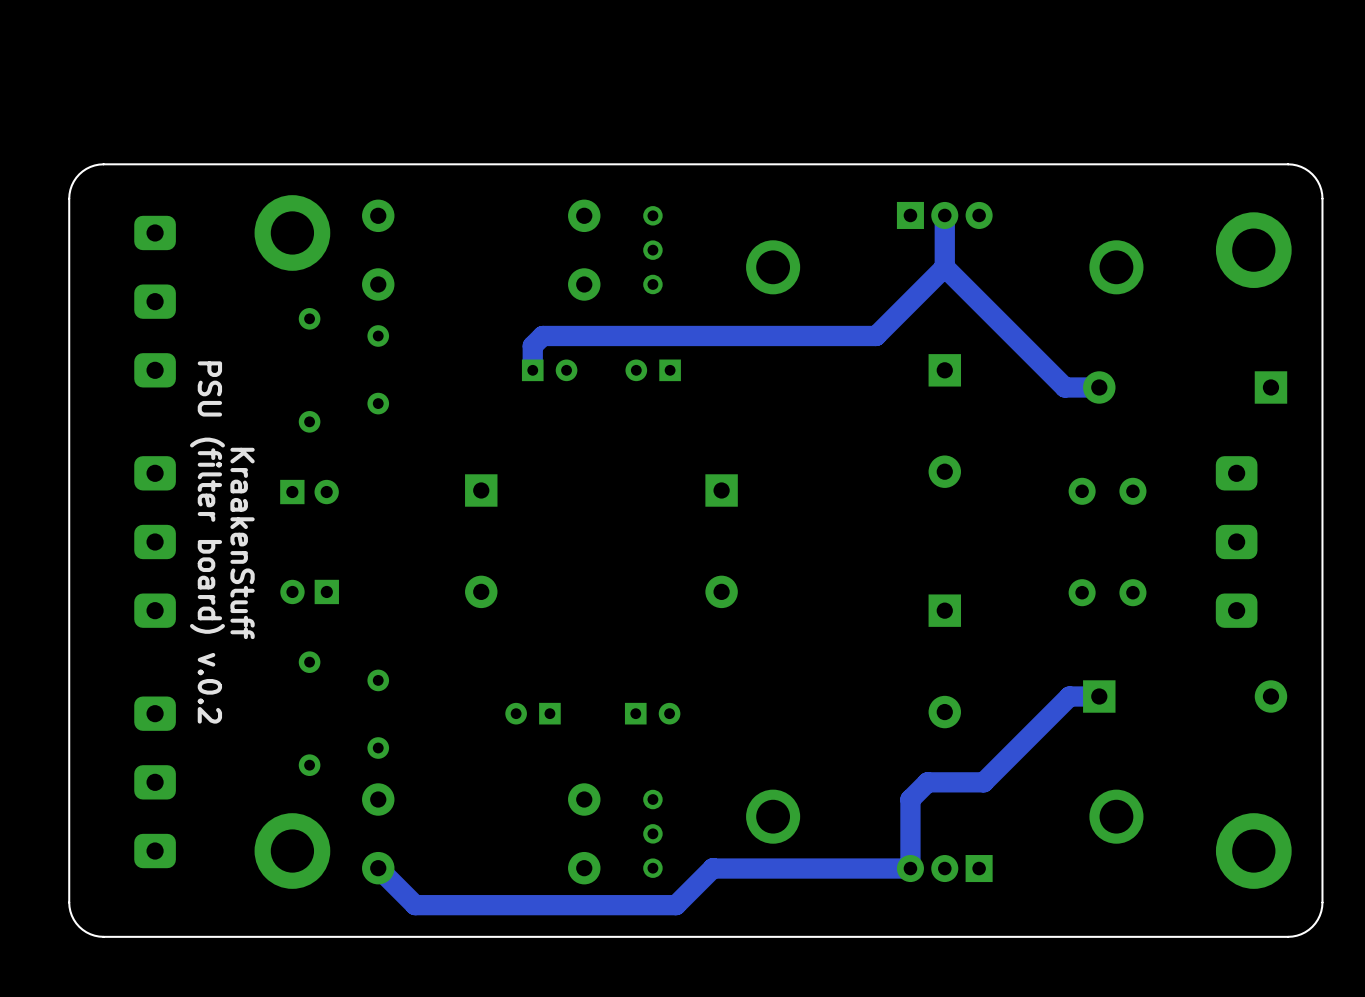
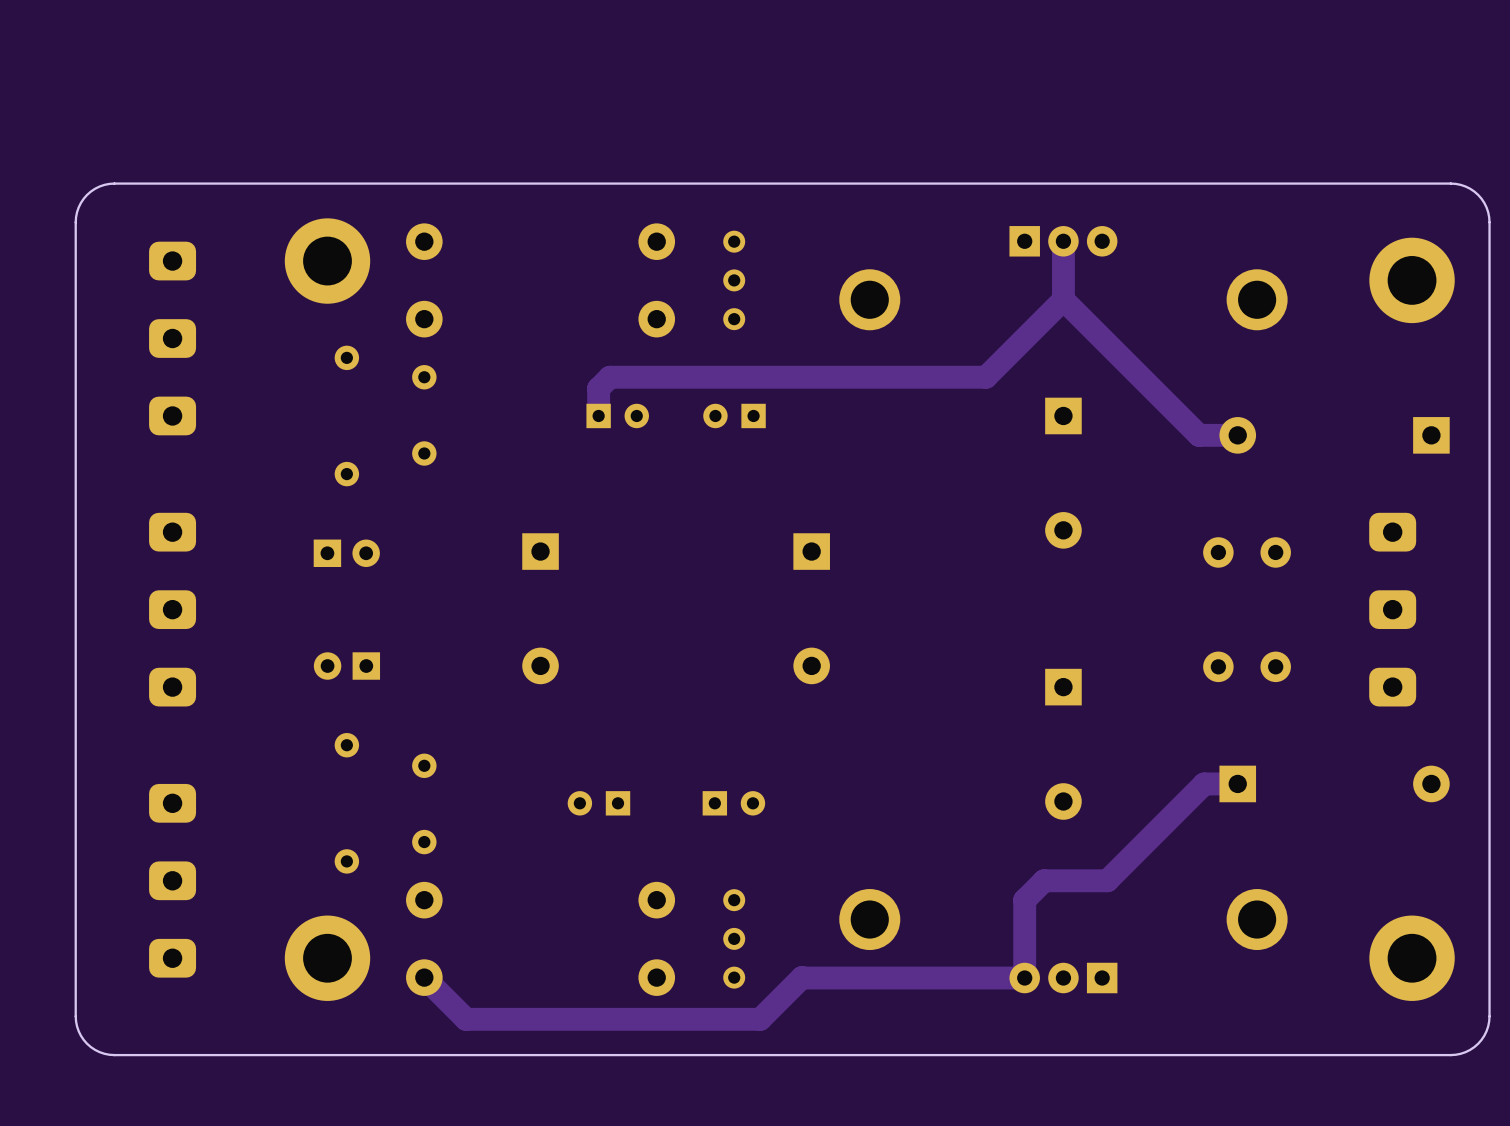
text: PSU (filter board) v.0.2 (207, 542) -> none
text: KraakenStuff (242, 543) -> none

